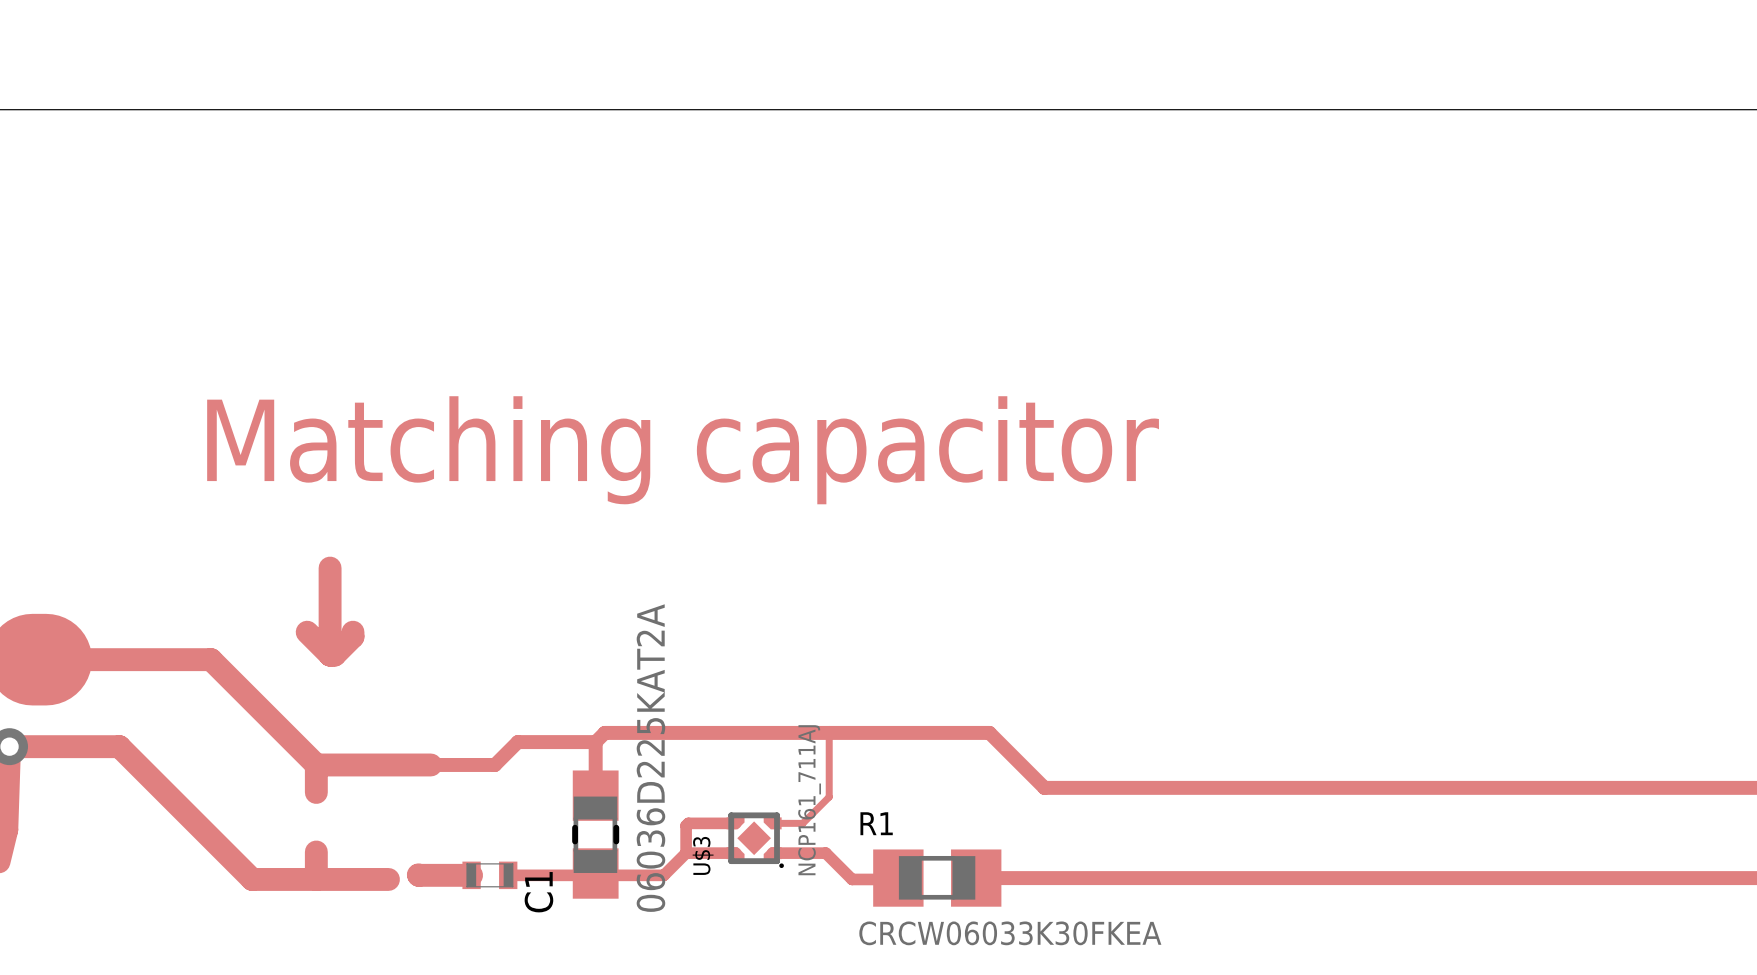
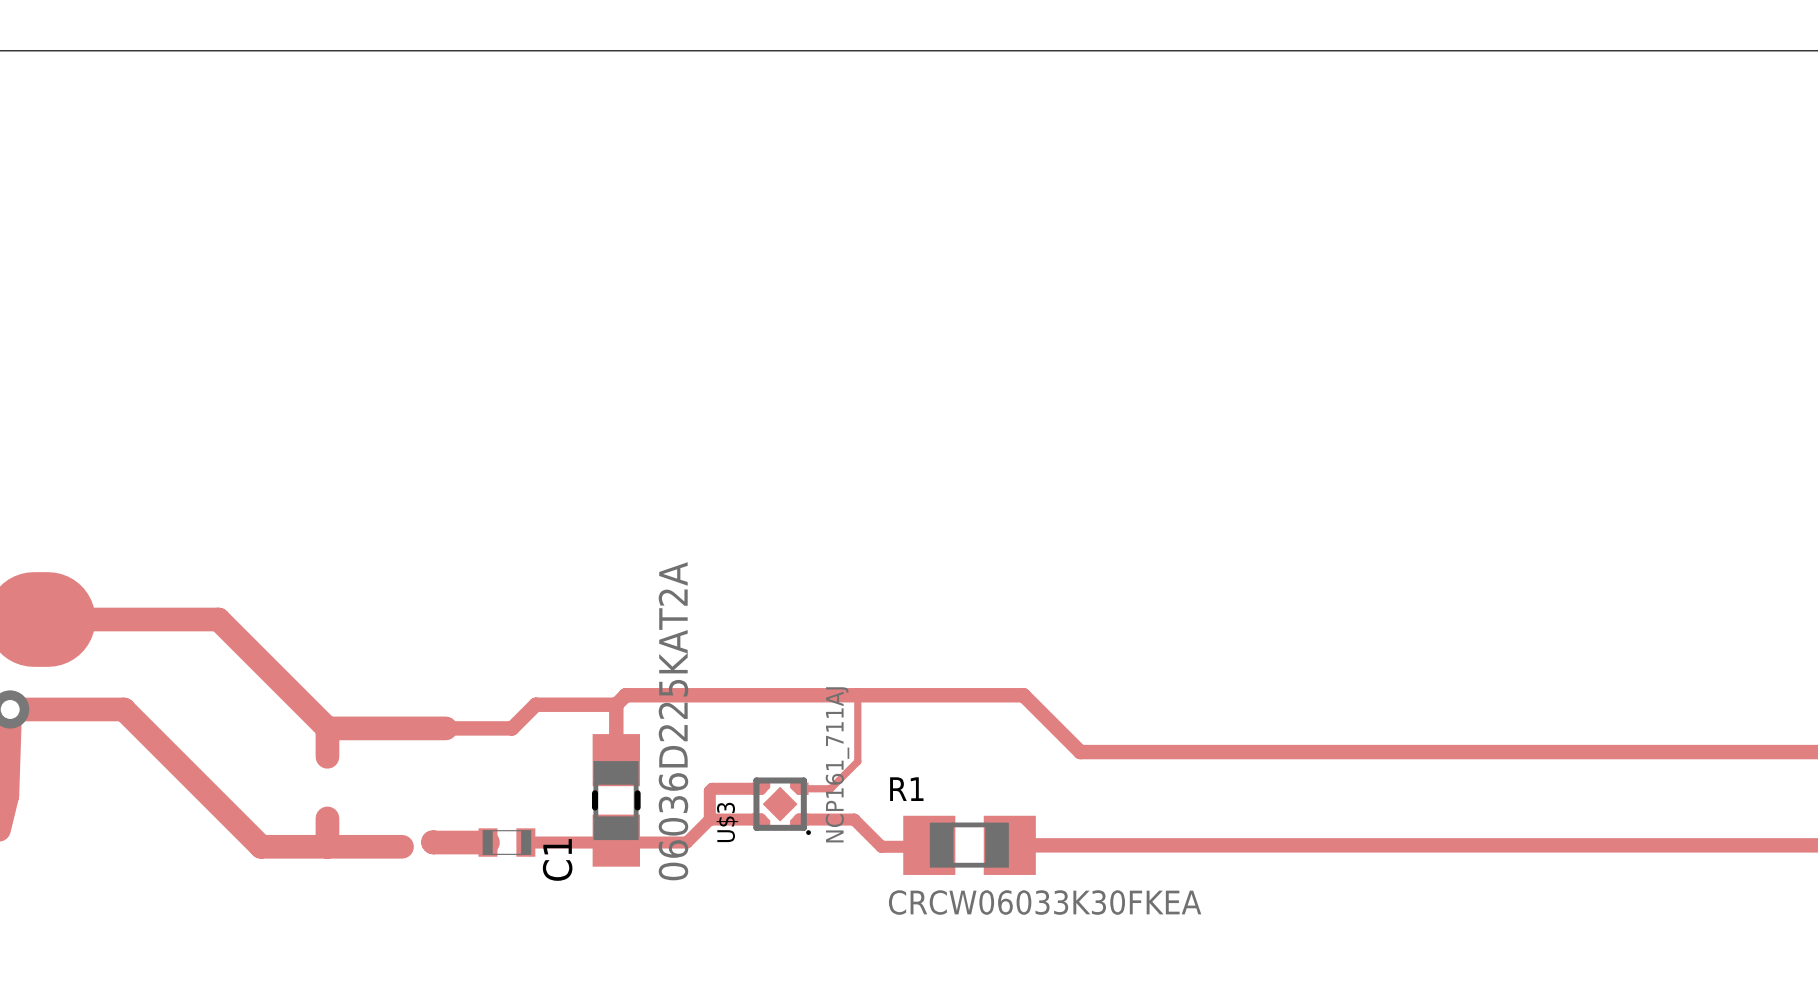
text: Matching capacitor (683, 450) -> none
track: (330, 568) (330, 655) -> none
track: (307, 632) (330, 655) -> none
track: (352, 632) (352, 636) (334, 655) (330, 655) -> none

